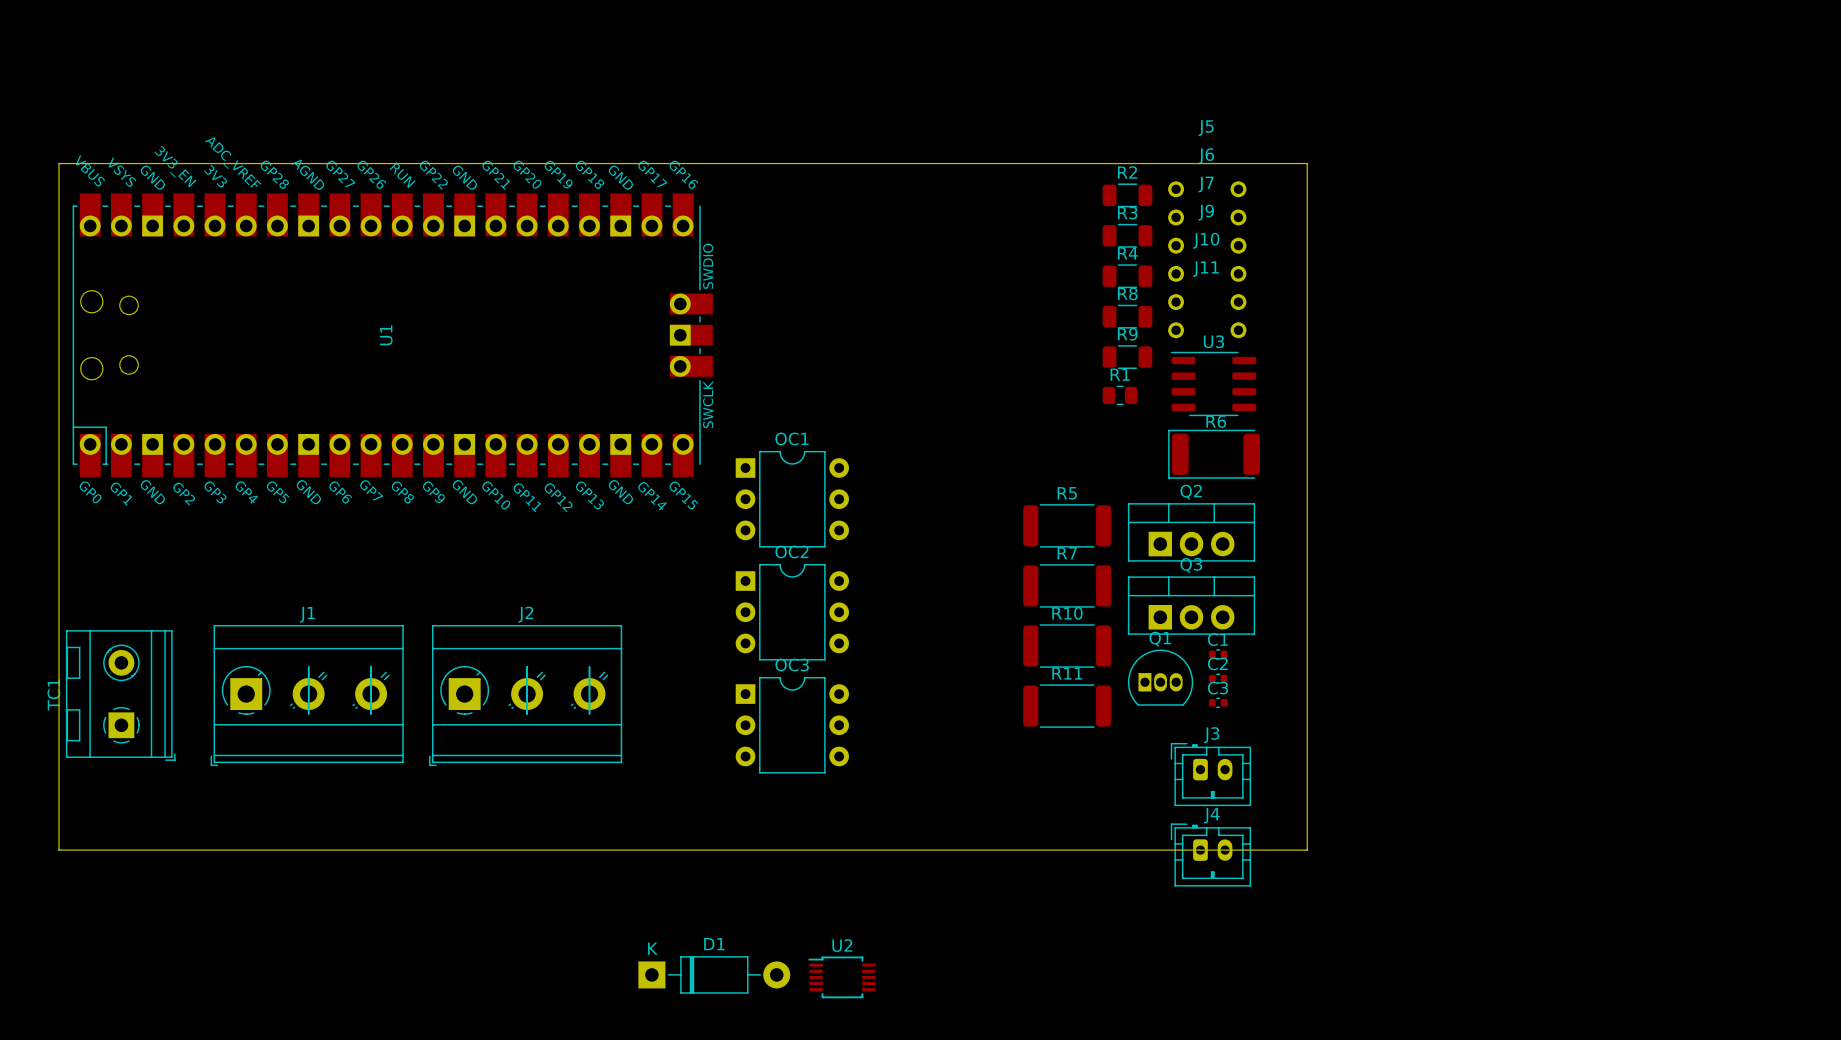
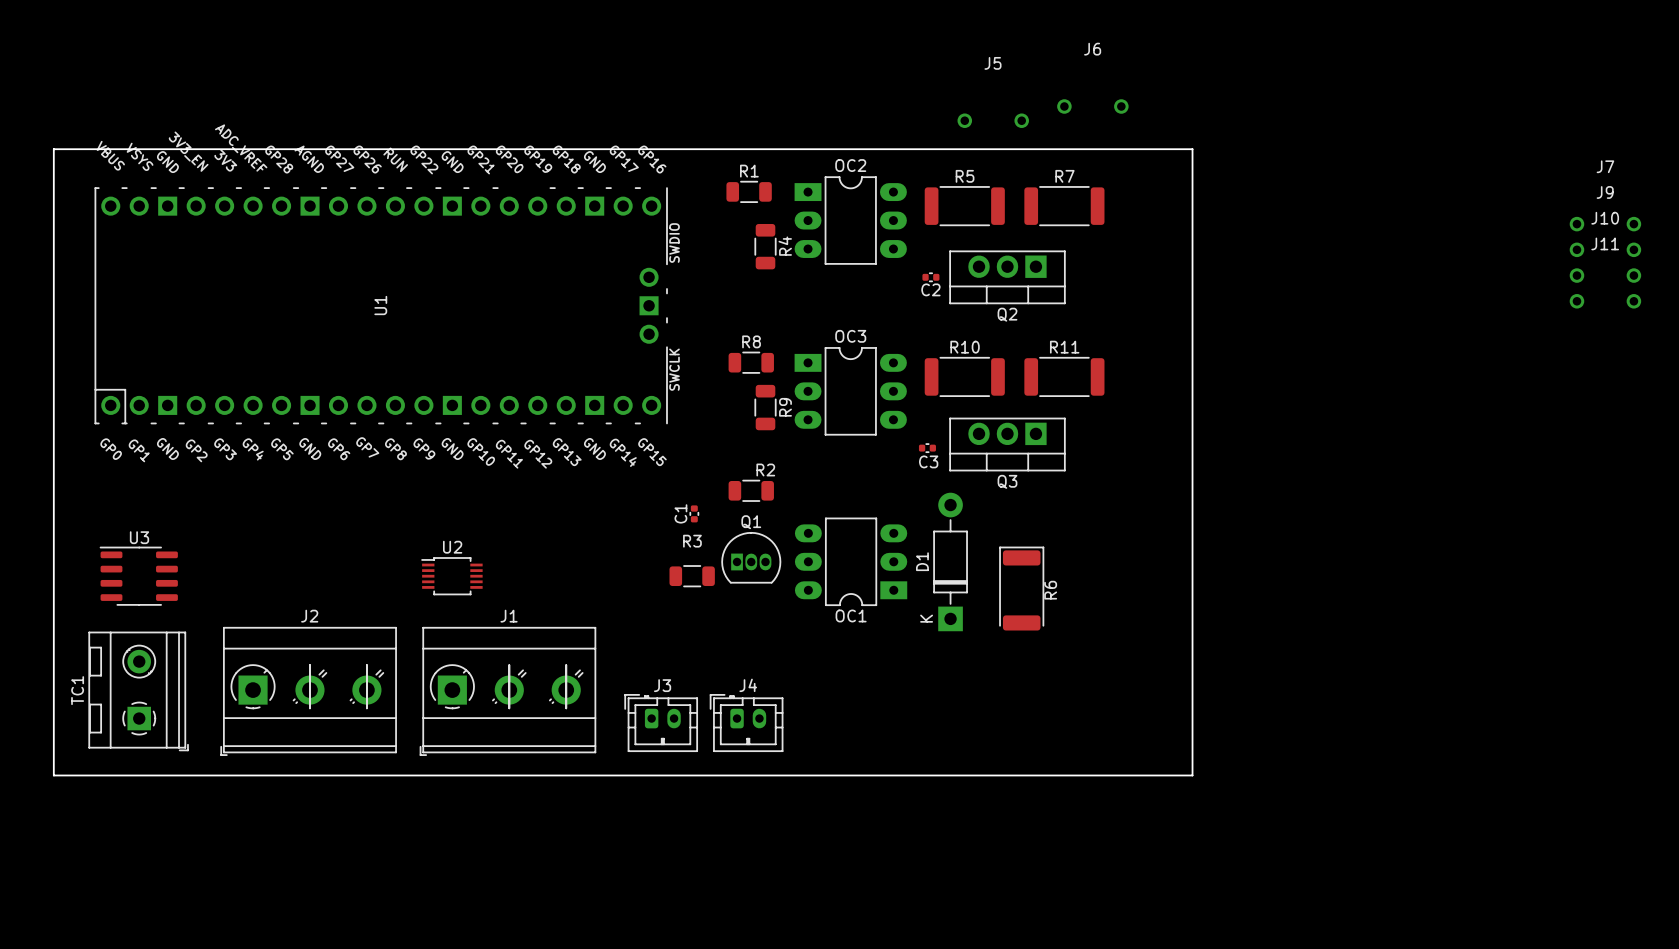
R2 name position: R2 (1127, 172) -> R2 (765, 469)
J5 position: (1207, 189) -> (993, 120)
U1 footprint: [72, 193, 713, 477] -> [94, 187, 668, 425]
R2 position: (1127, 195) -> (751, 490)
R3 name position: R3 (1127, 212) -> R3 (692, 541)
J6 position: (1207, 217) -> (1092, 106)
R3 position: (1127, 235) -> (692, 576)
J7 position: (1207, 245) -> (1605, 224)
J9 position: (1207, 273) -> (1605, 249)
R4 rotation: 0° (1127, 276) -> 90° clockwise (765, 246)
R4 position: (1127, 276) -> (765, 246)
J10 position: (1207, 302) -> (1605, 275)
R8 position: (1127, 316) -> (751, 362)
J11 position: (1207, 330) -> (1605, 301)
R9 rotation: 0° (1127, 357) -> 90° clockwise (765, 407)
R9 position: (1127, 357) -> (765, 407)
U3 position: (1213, 383) -> (138, 576)
R1 footprint: [1102, 385, 1138, 406] -> [726, 181, 772, 203]
OC1 name position: OC1 (792, 438) -> OC1 (851, 615)
OC1 footprint: [735, 450, 849, 548] -> [794, 517, 908, 606]
R6 rotation: 0° (1213, 454) -> 90° clockwise (1021, 588)
R6 position: (1213, 454) -> (1021, 588)
R5 position: (1067, 525) -> (964, 206)
Q2 rotation: 0° (1191, 532) -> 180° (1007, 277)
Q2 position: (1191, 532) -> (1007, 277)
OC2 footprint: [735, 563, 849, 661] -> [794, 176, 907, 265]
R7 position: (1067, 585) -> (1064, 206)
Q3 rotation: 0° (1191, 605) -> 180° (1007, 444)
Q3 position: (1191, 605) -> (1007, 444)
R10 position: (1067, 646) -> (964, 376)
C1 rotation: 0° (1218, 654) -> 90° clockwise (694, 513)
C1 position: (1218, 654) -> (694, 513)
C2 name position: C2 (1217, 663) -> C2 (930, 289)
OC3 footprint: [735, 676, 849, 774] -> [794, 347, 907, 436]
Q1 position: (1160, 677) -> (751, 557)
C2 position: (1218, 678) -> (930, 277)
C3 name position: C3 (1217, 688) -> C3 (928, 461)
TC1 position: (120, 695) -> (138, 691)
J1 position: (307, 695) -> (507, 691)
J2 position: (525, 695) -> (308, 691)
C3 position: (1218, 702) -> (927, 448)
R11 position: (1067, 706) -> (1064, 376)
J3 position: (1210, 774) -> (661, 723)
J4 position: (1210, 855) -> (746, 723)
D1 rotation: 0° (714, 974) -> 90° counterclockwise (950, 561)
D1 position: (714, 974) -> (950, 561)
U2 position: (842, 977) -> (451, 576)

